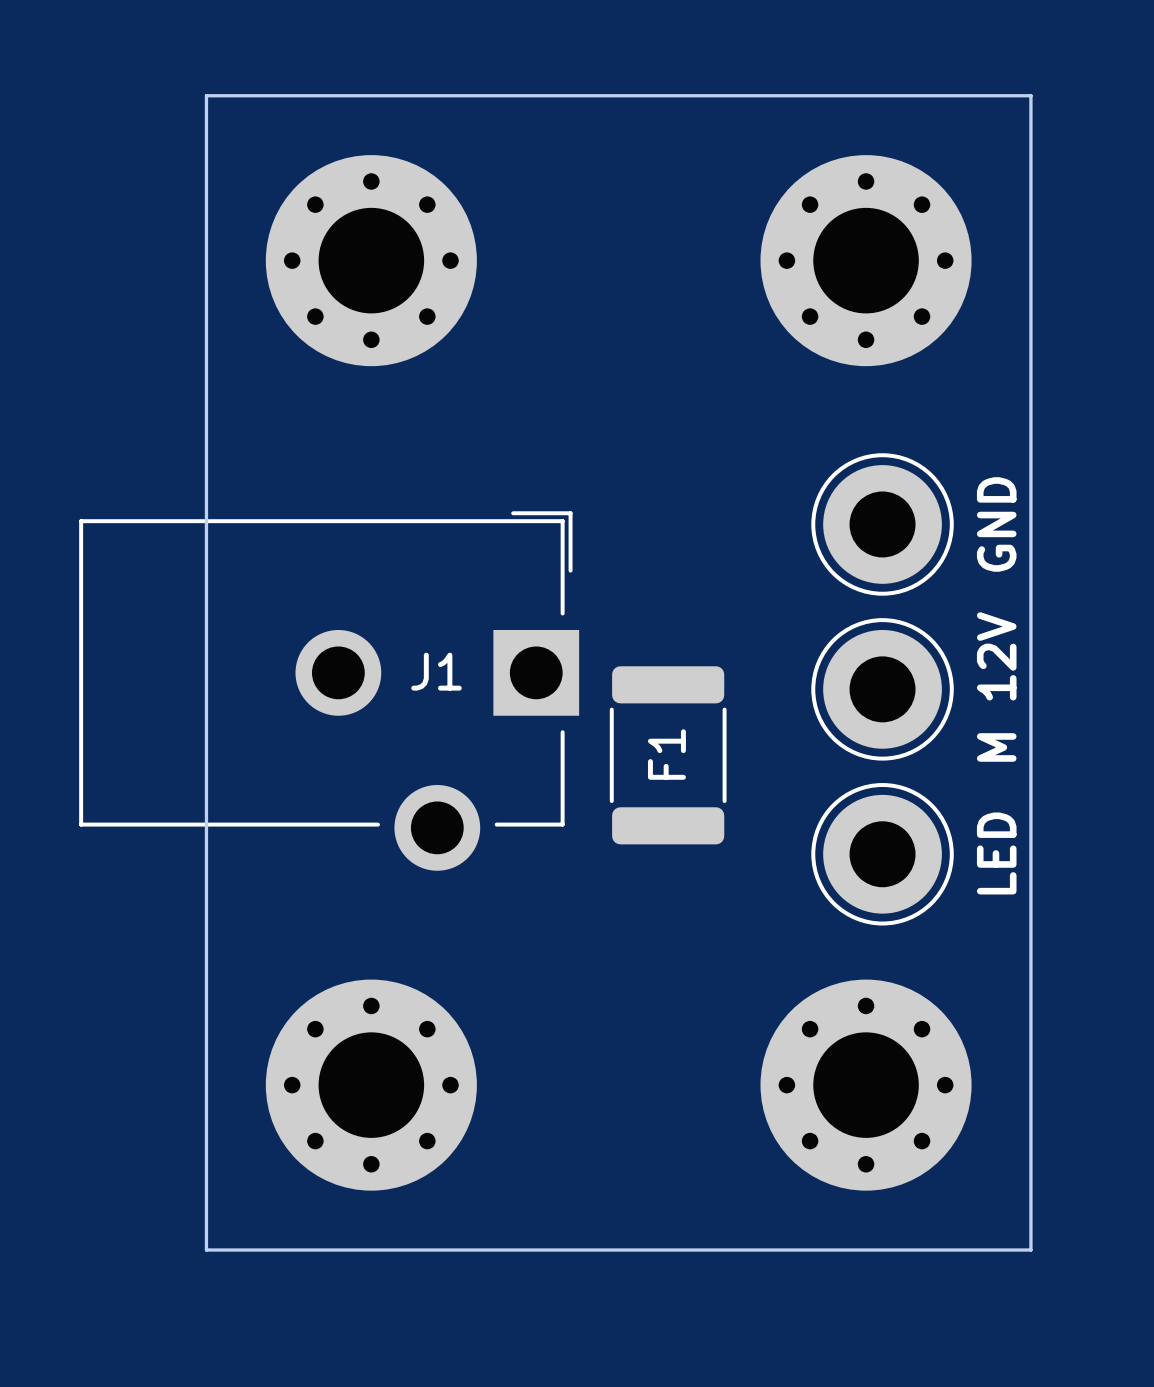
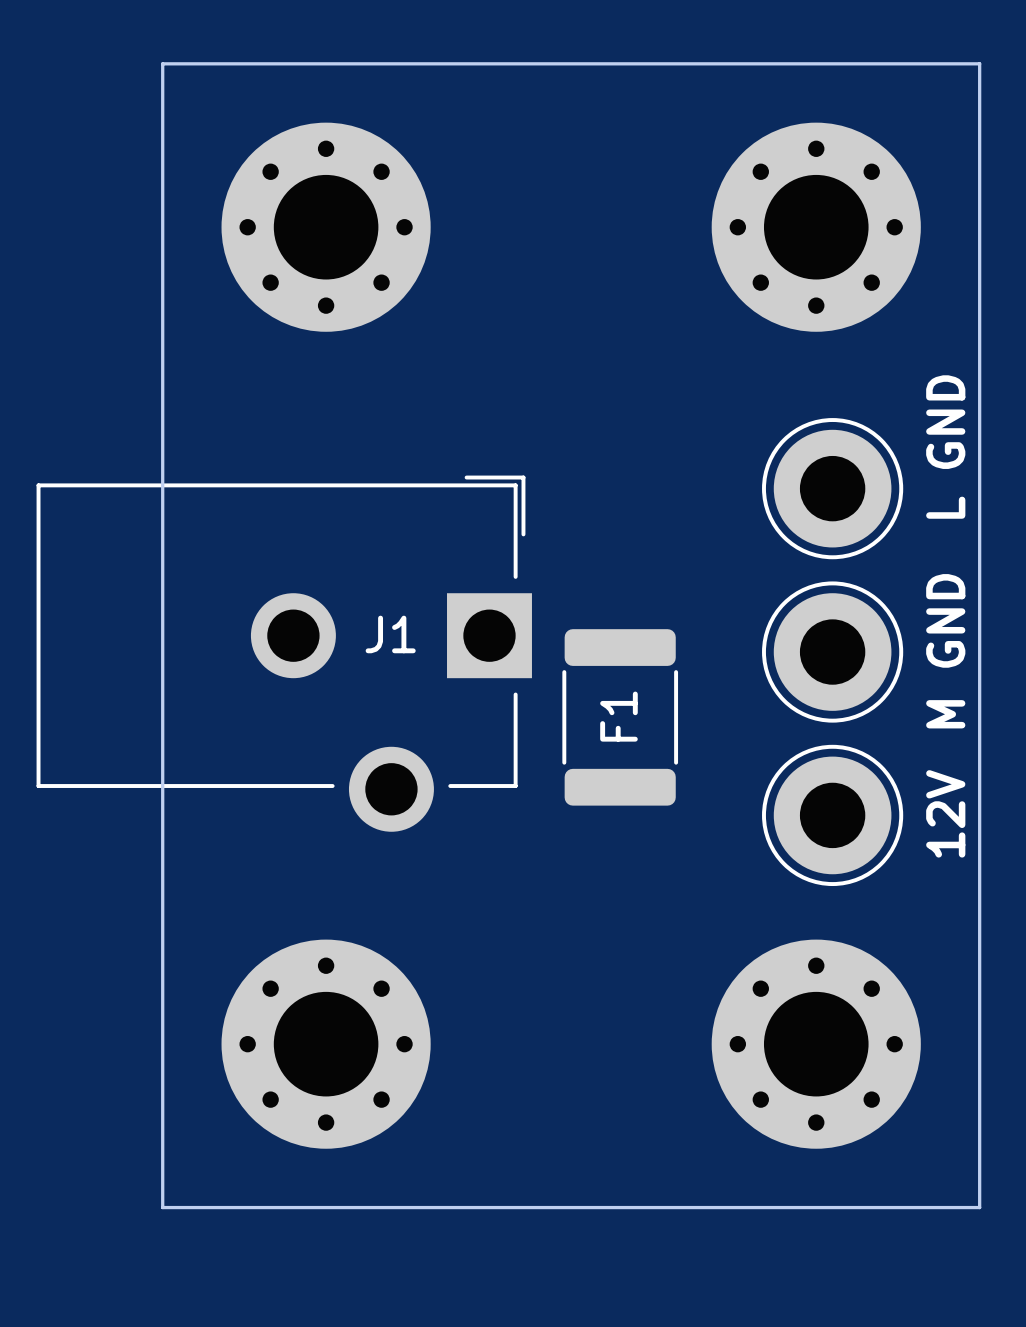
text: GND (996, 524) -> L GND (945, 447)
text: M 12V (996, 687) -> M GND (945, 651)
text: LED (996, 853) -> 12V (945, 813)

